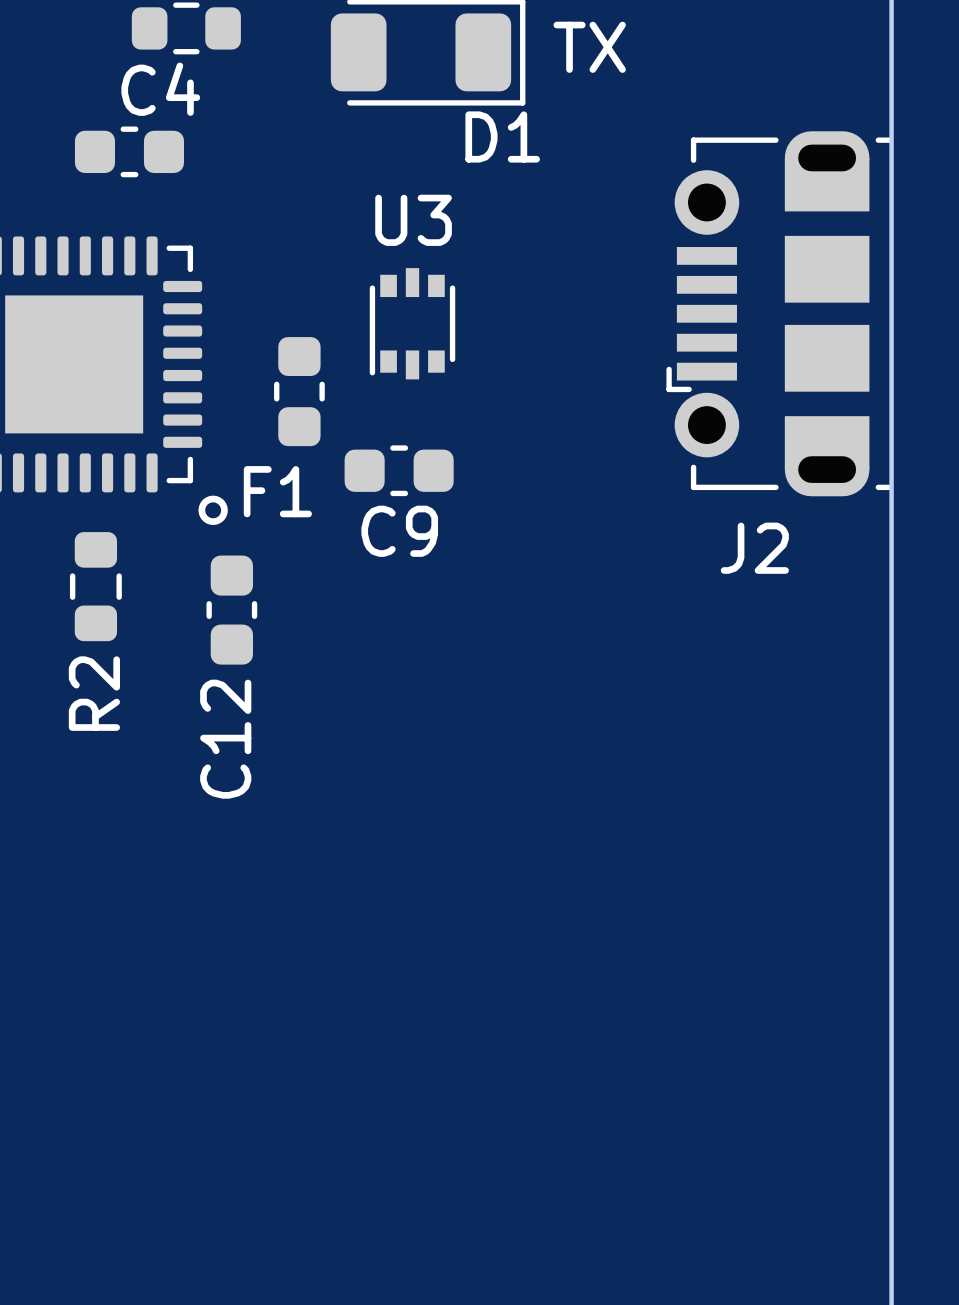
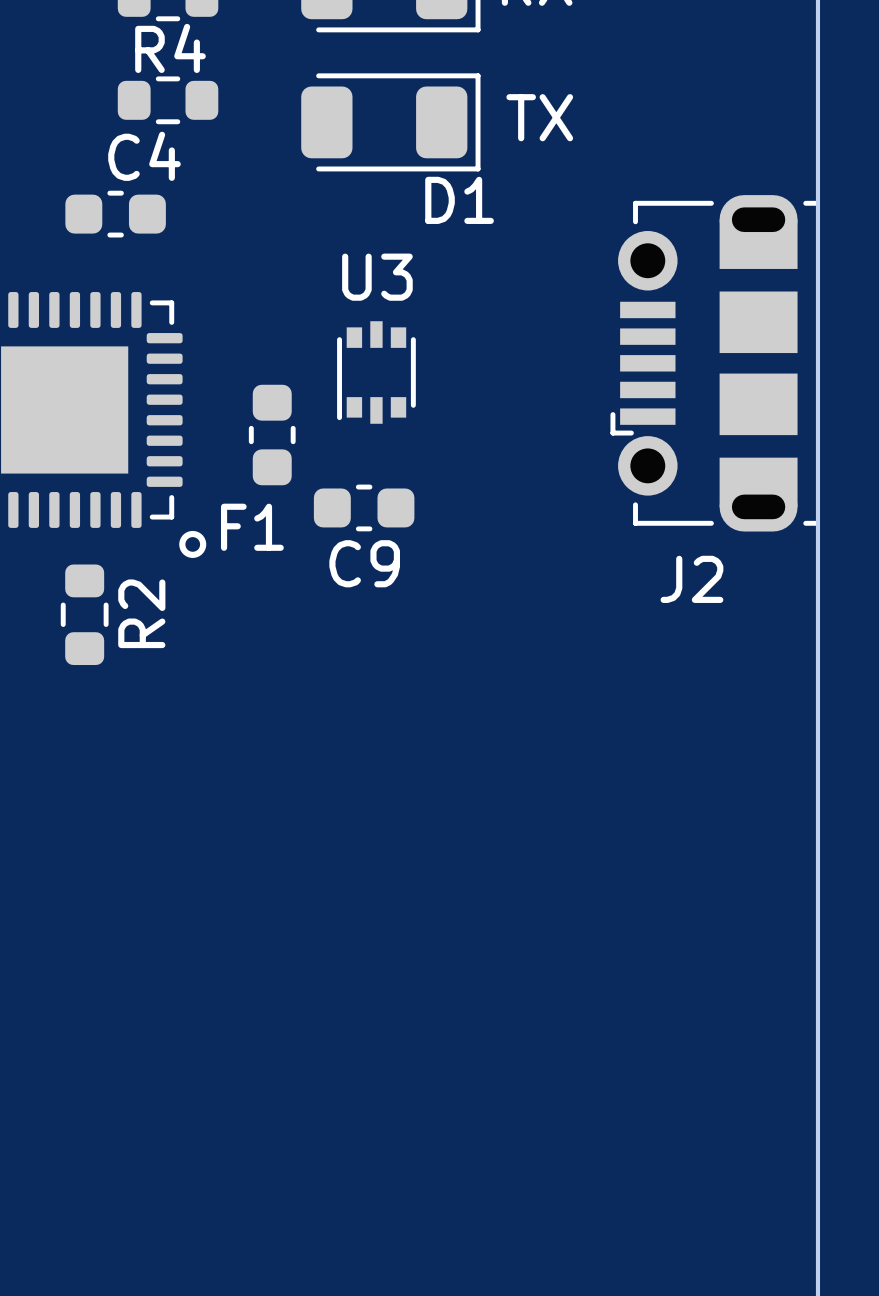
C12: (231, 610) -> none
R2 name position: R2 (94, 693) -> R2 (141, 613)

